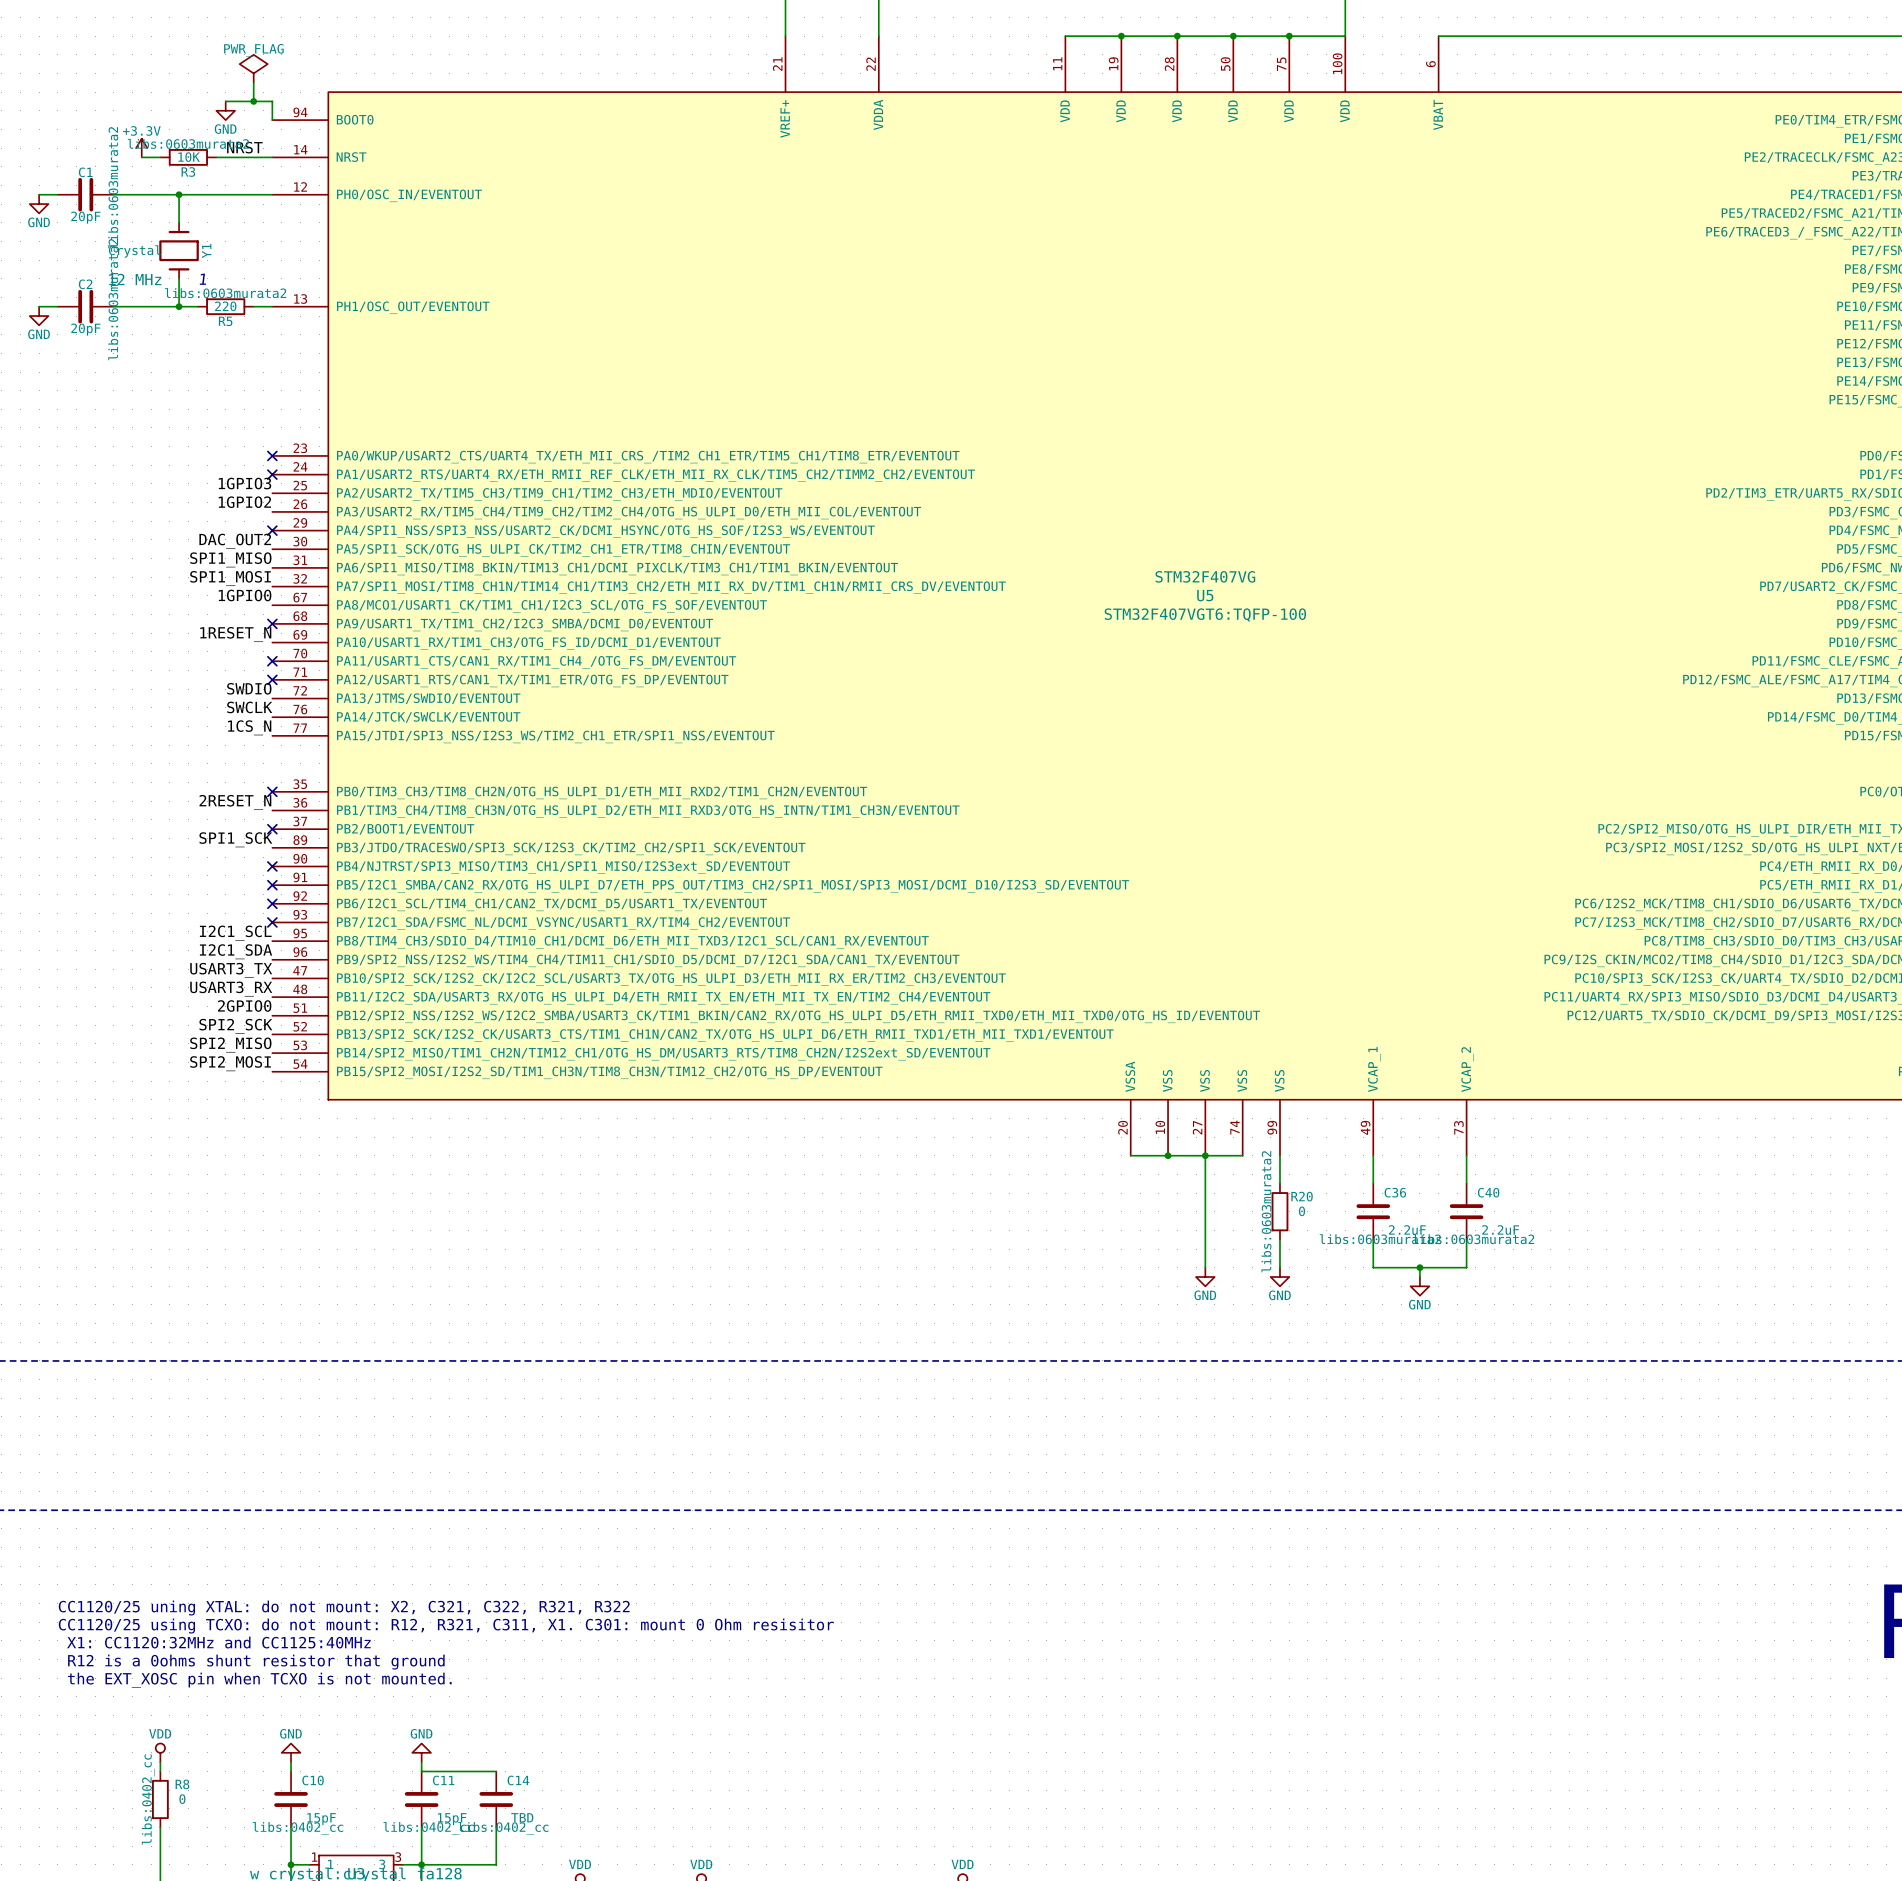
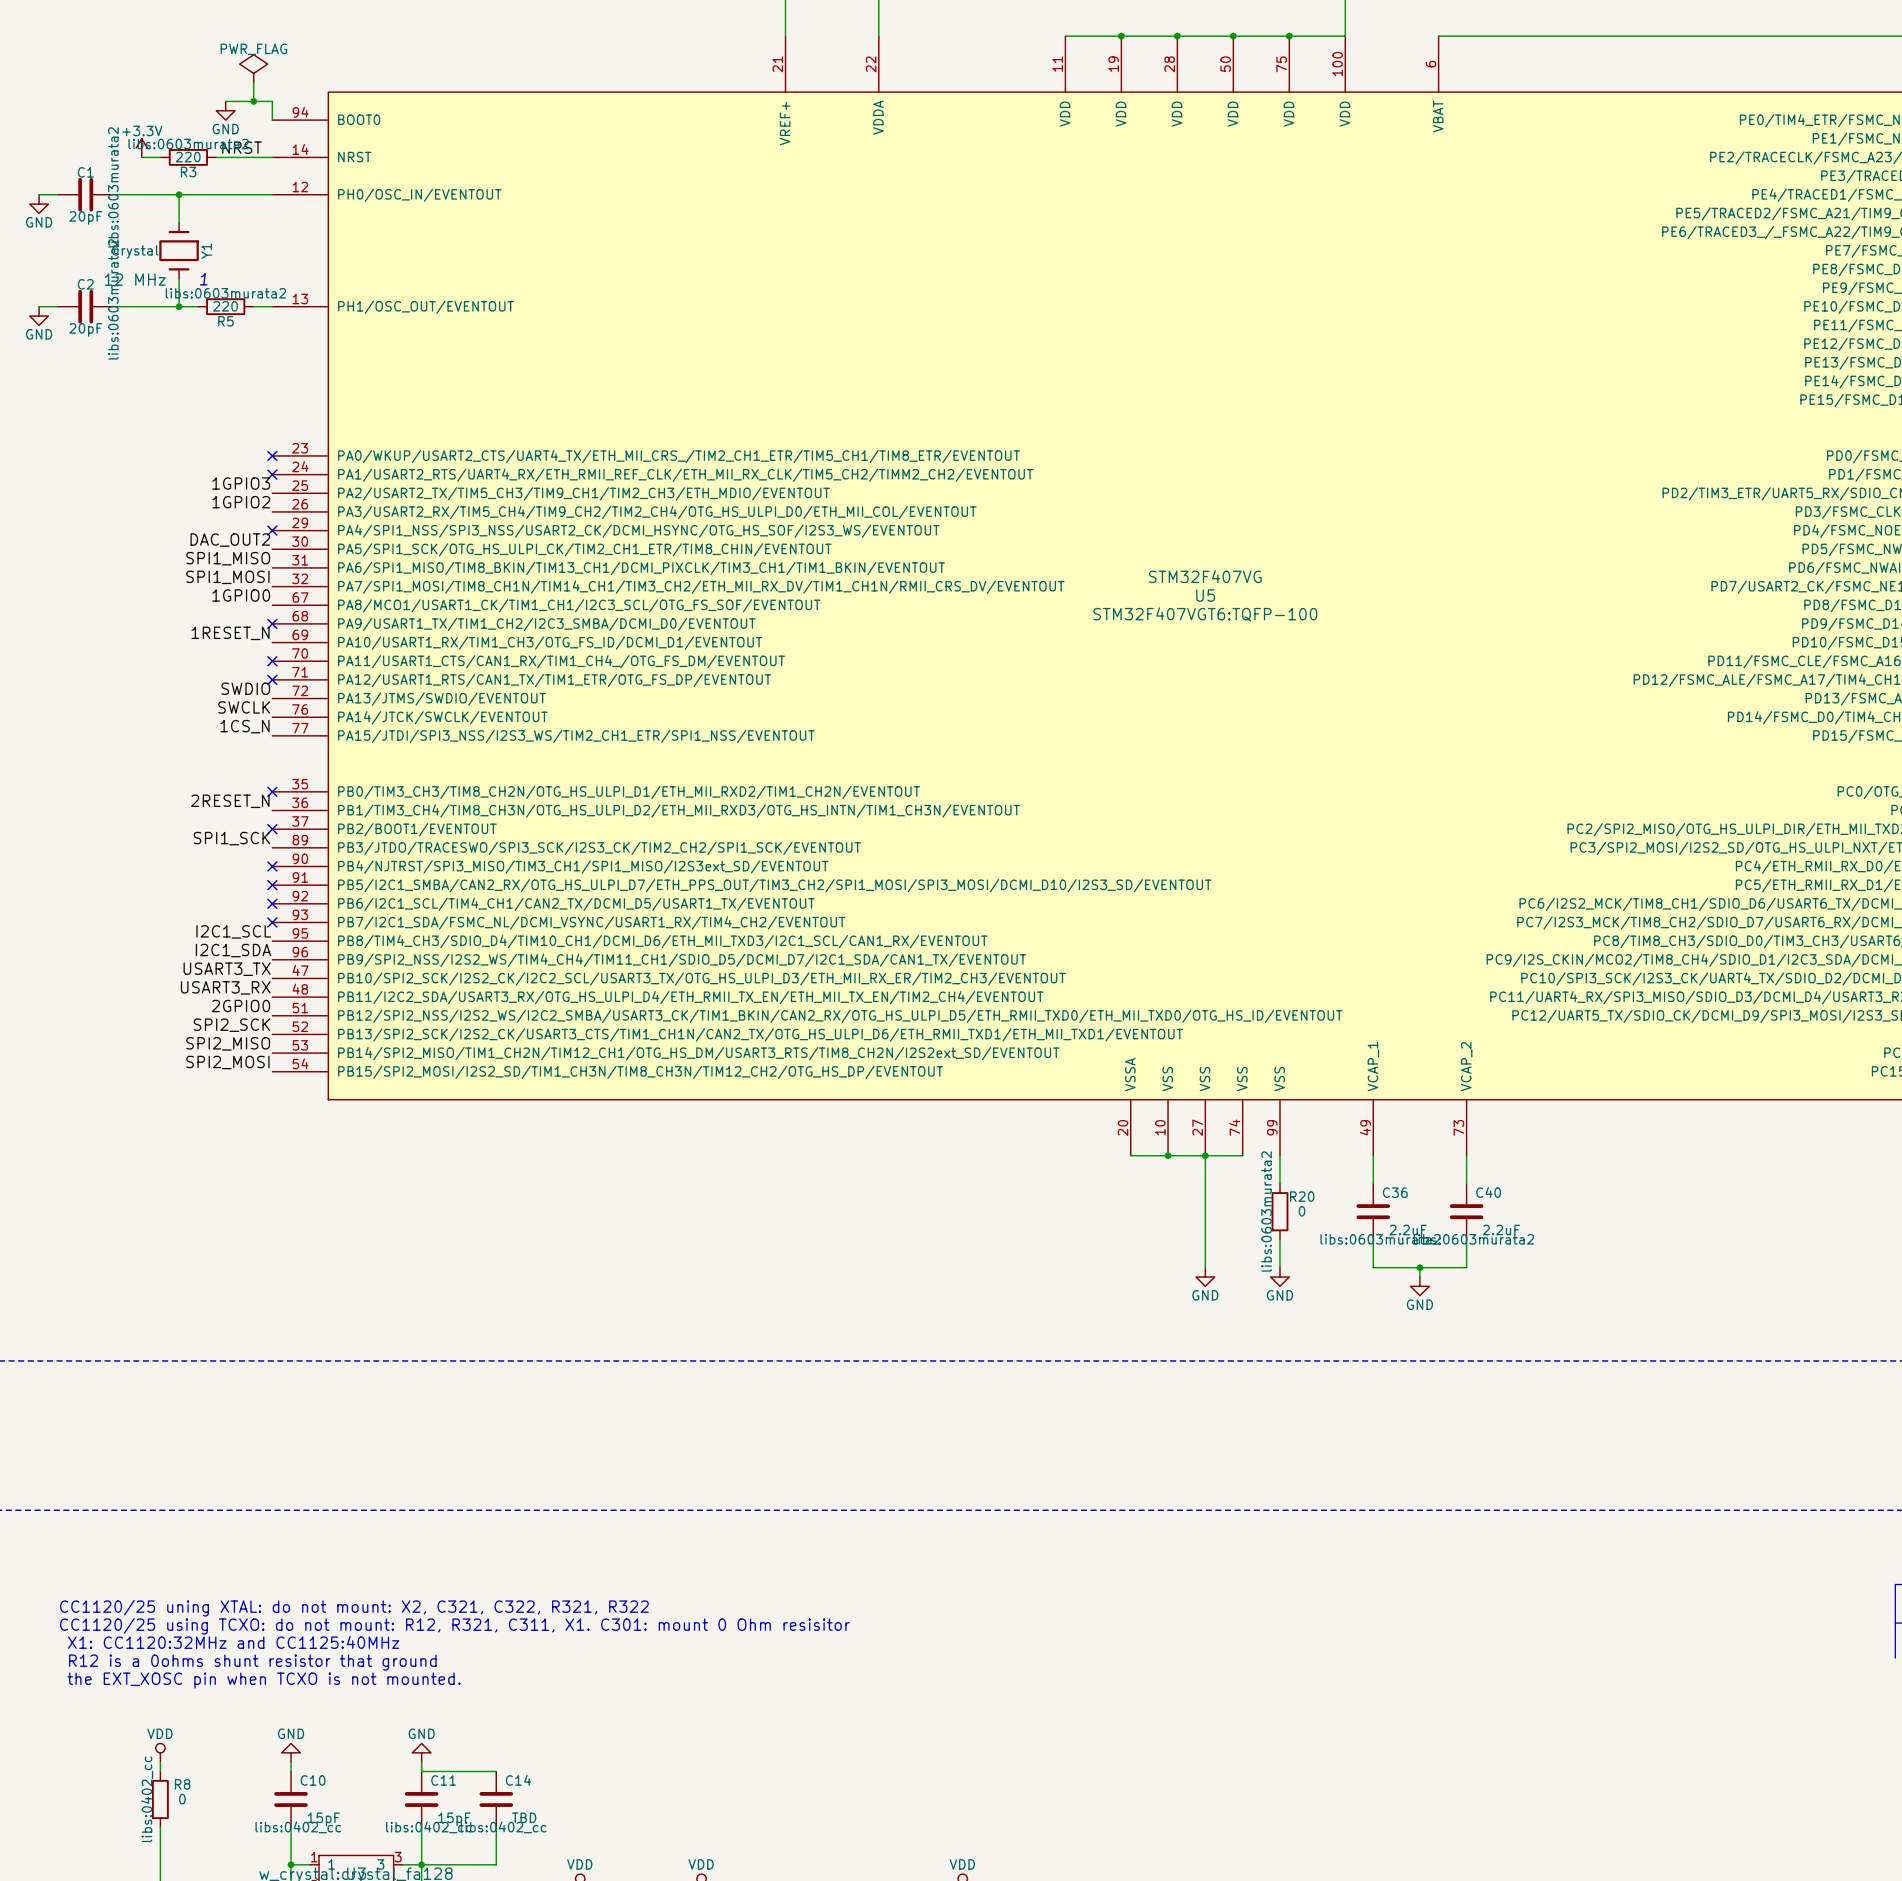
R3 value: 10K (189, 157) -> 220 (188, 157)

